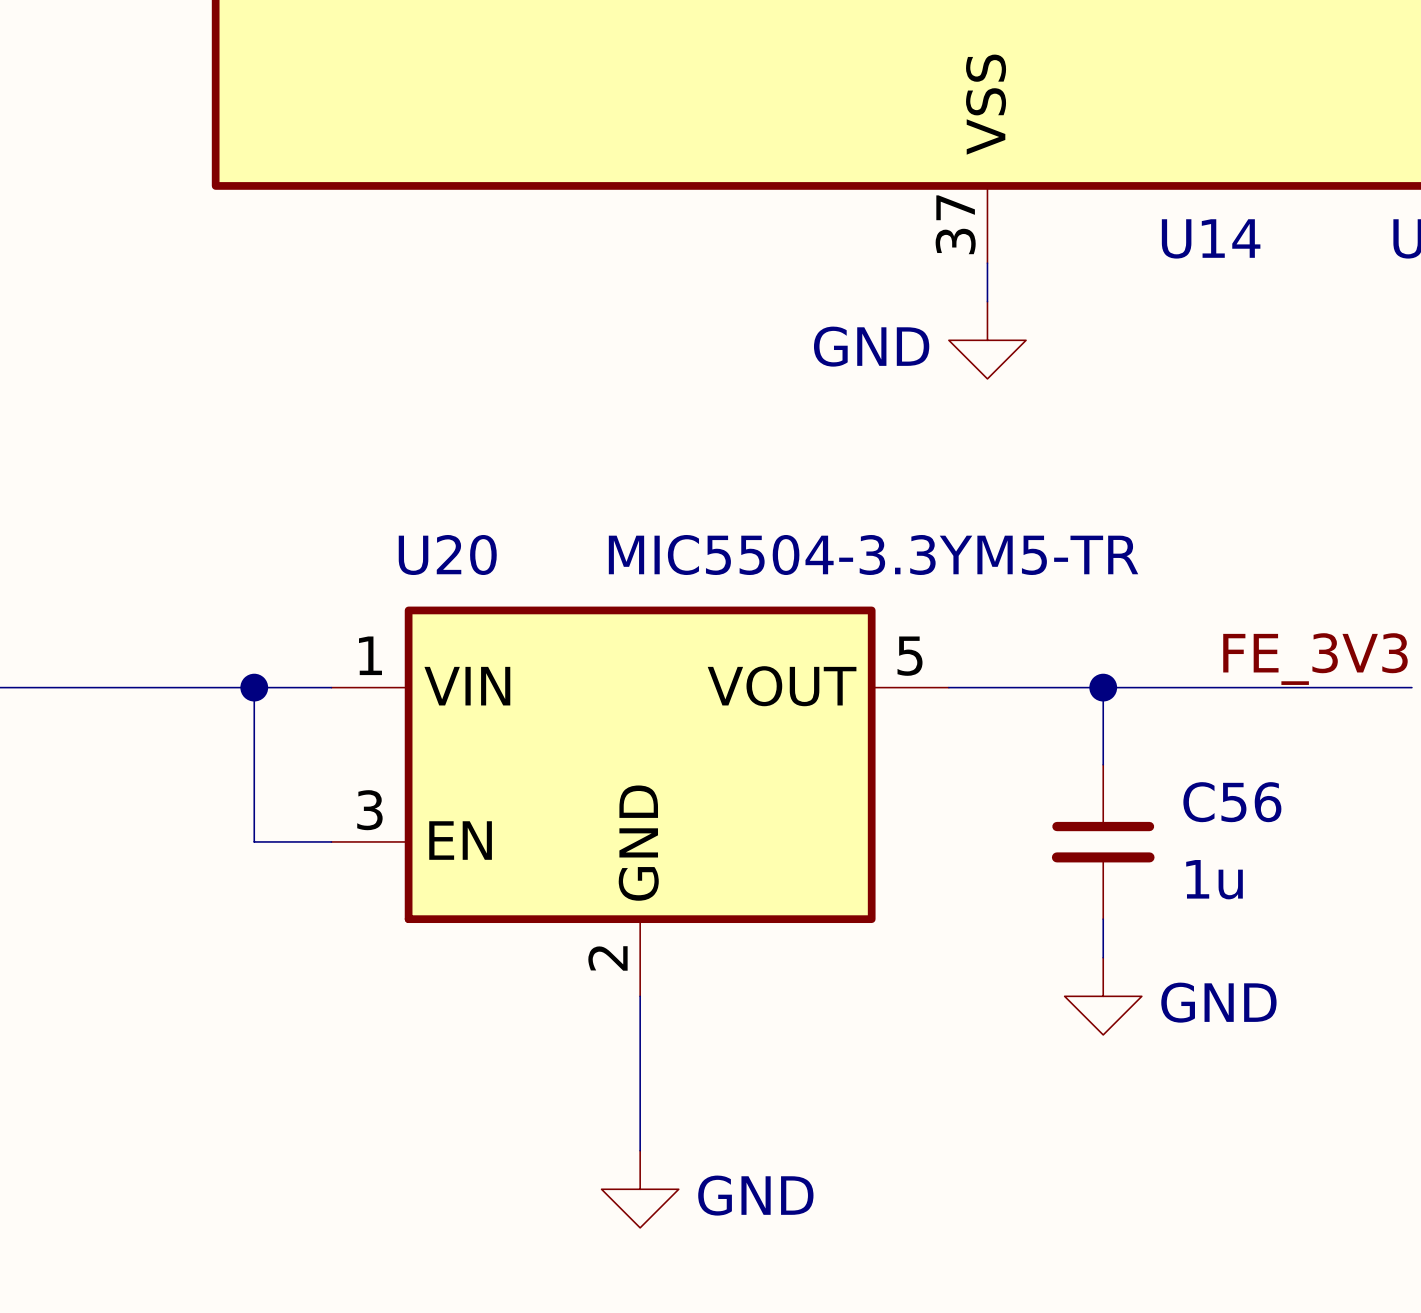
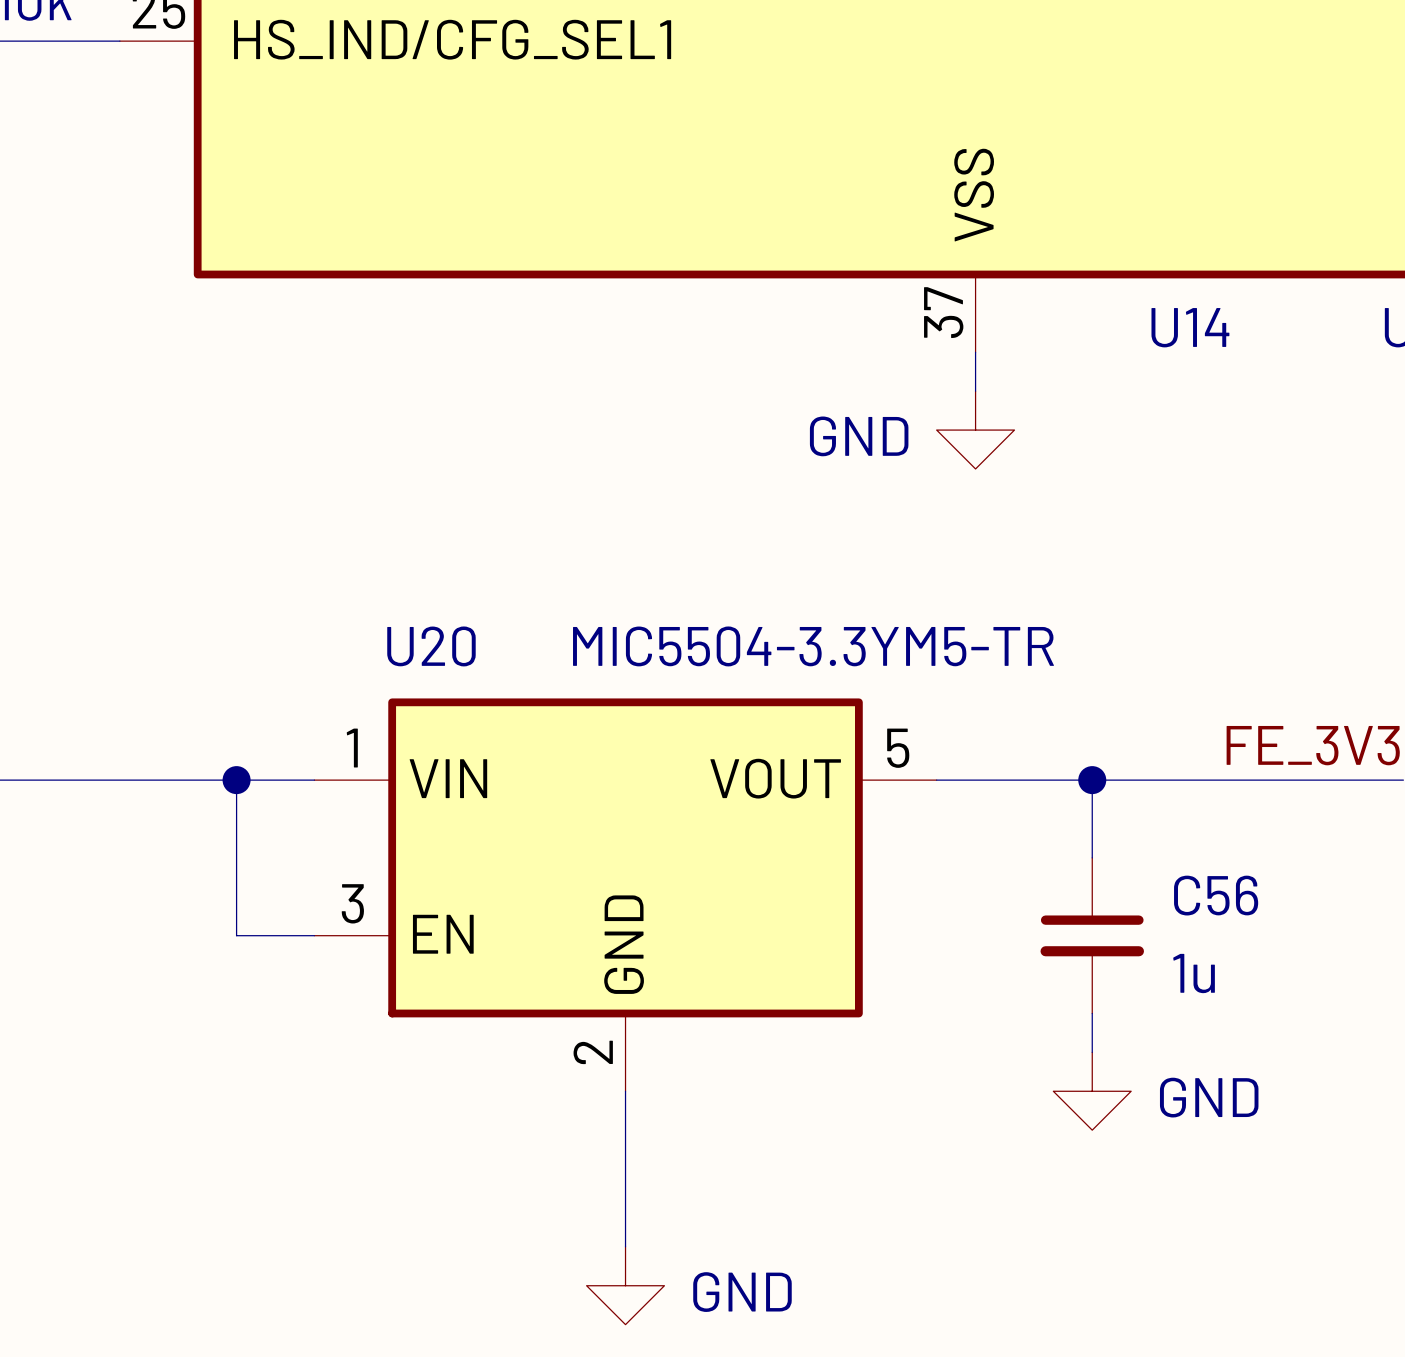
U20 value position: MIC5504-3.3YM5-TR (873, 554) -> MIC5504-3.3YM5-TR (813, 646)

